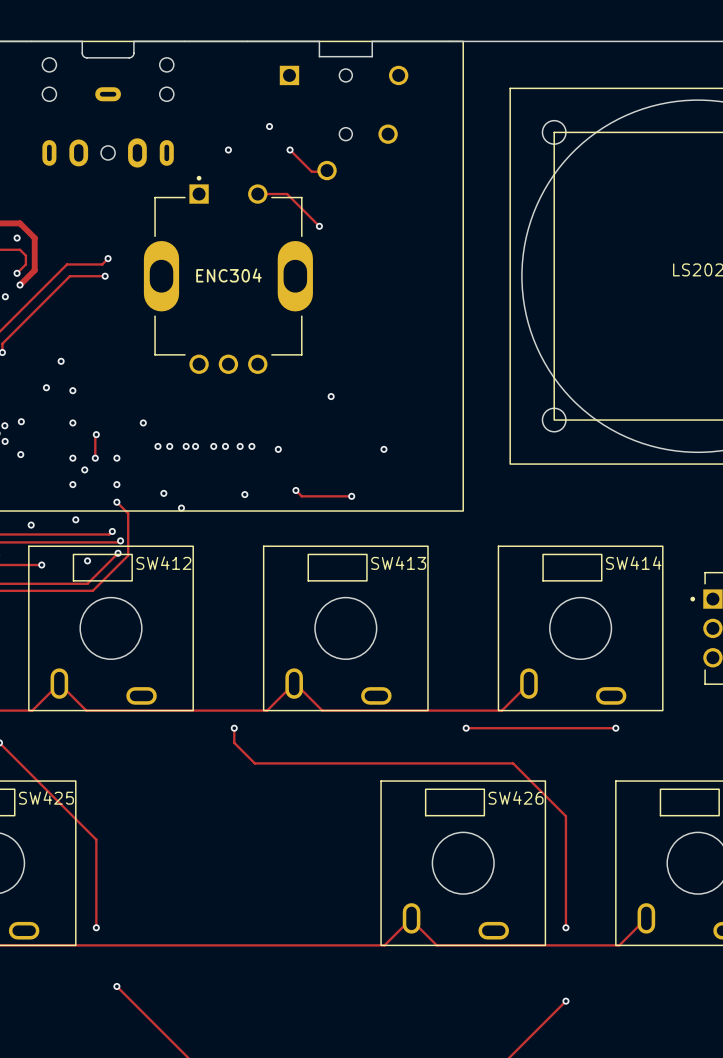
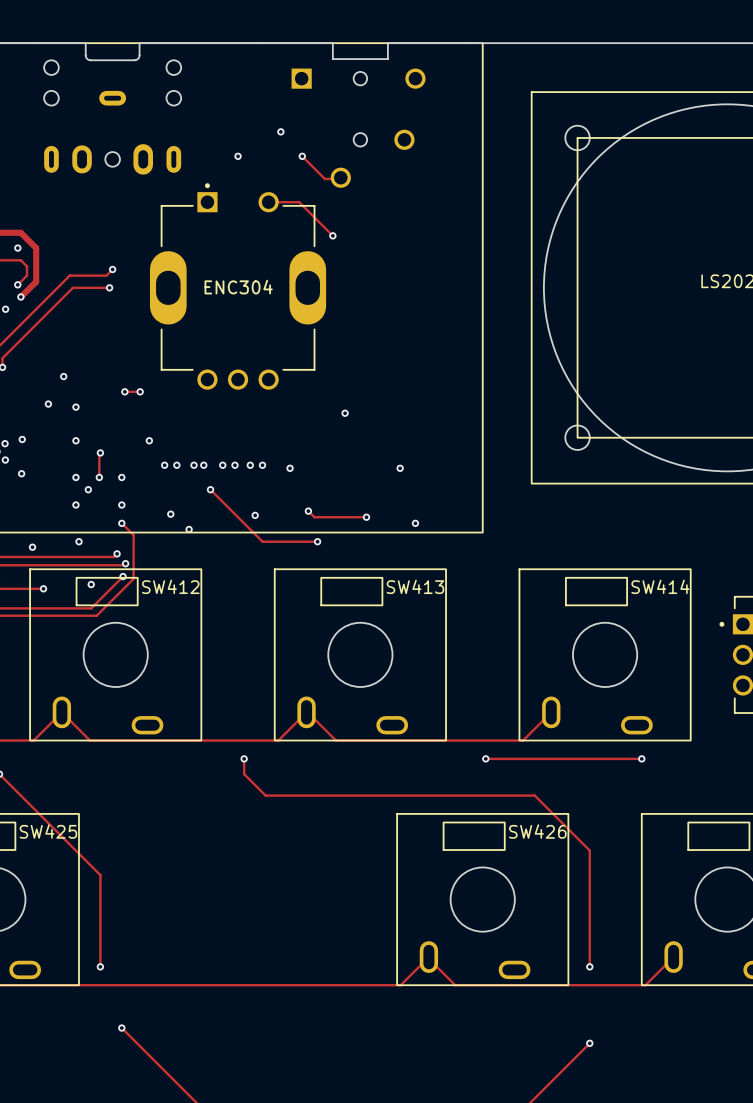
track: none -> (124, 391) (140, 391)
via: none -> (124, 391)
via: none -> (140, 391)
track: none -> (210, 489) (262, 541) (317, 541)
via: none -> (210, 489)
via: none -> (415, 523)
via: none -> (317, 541)

